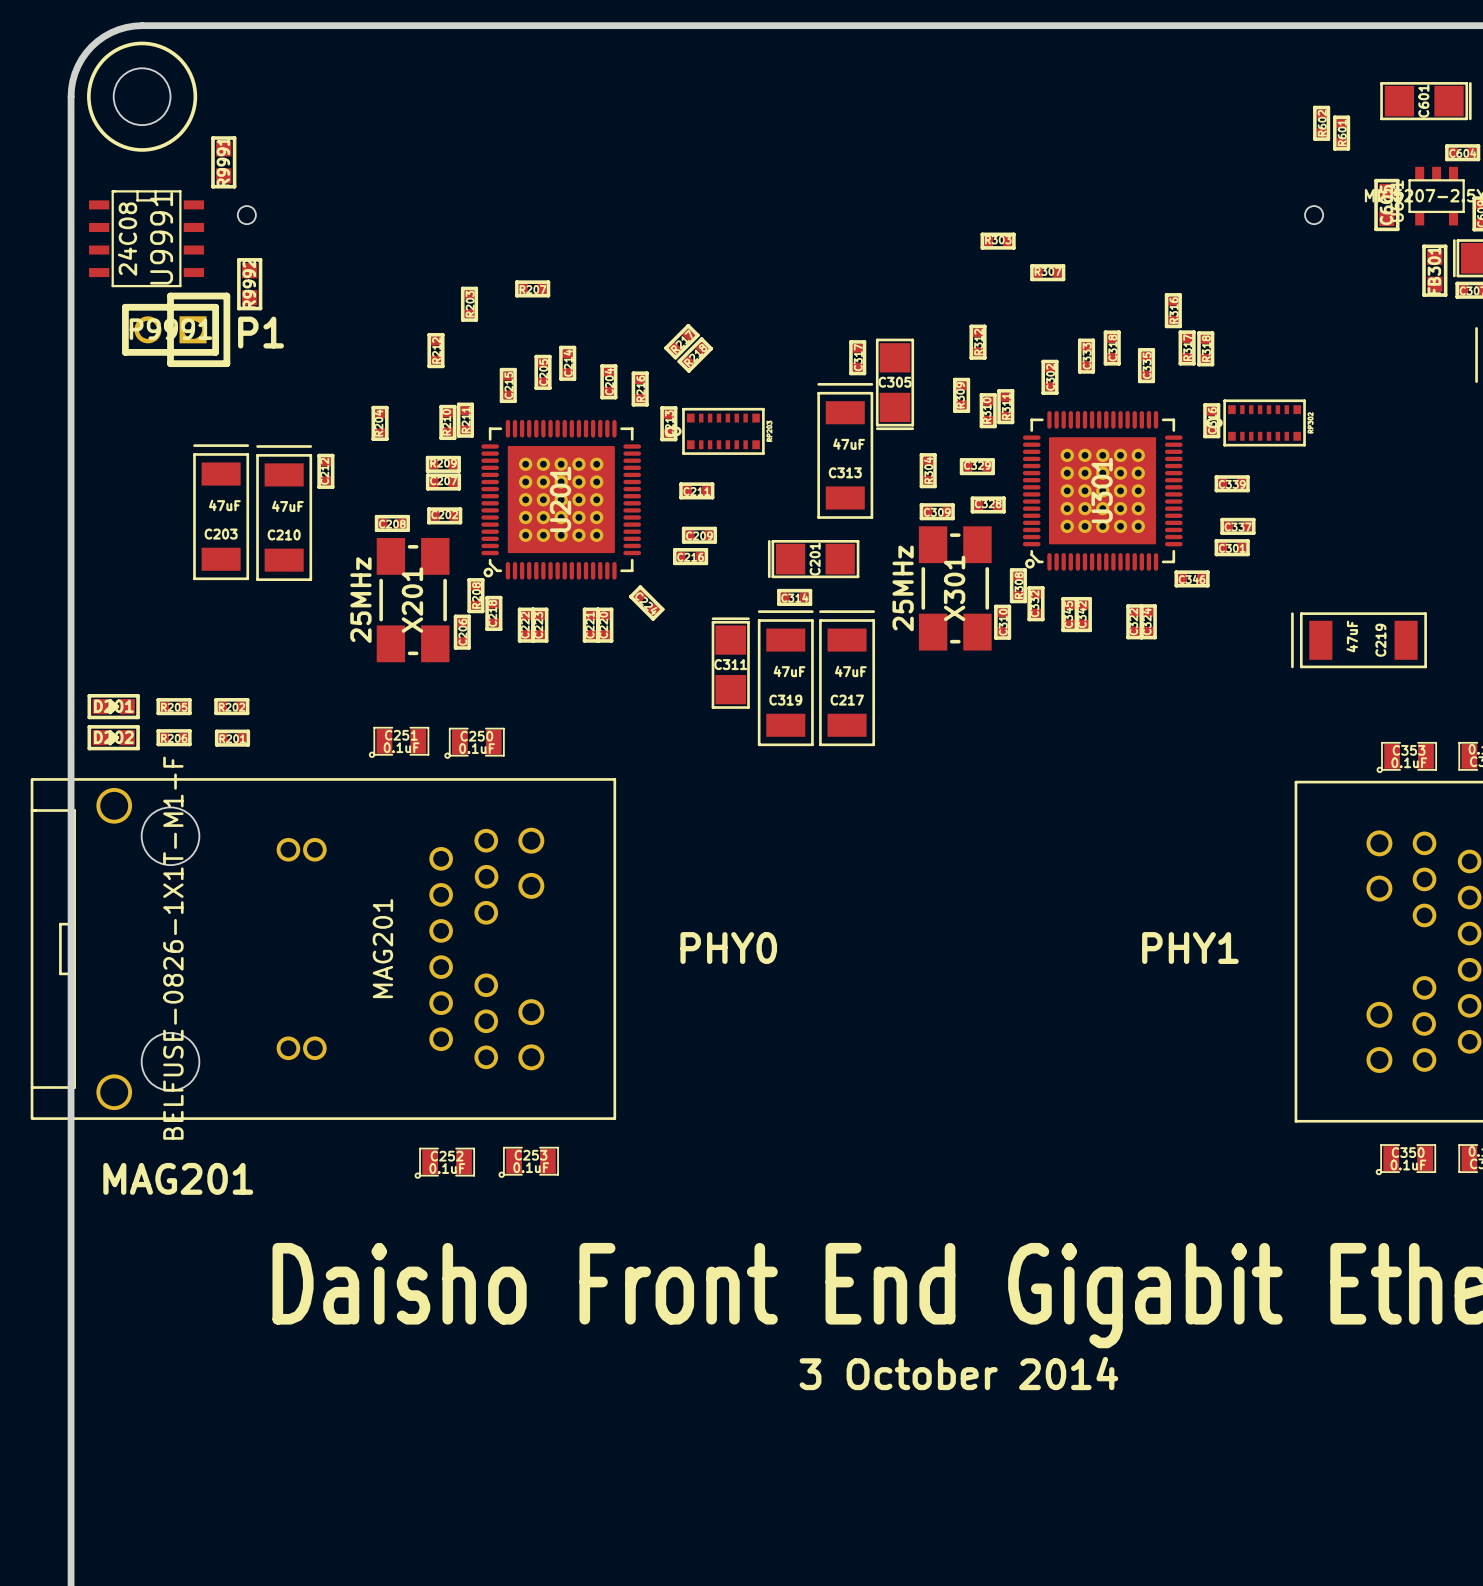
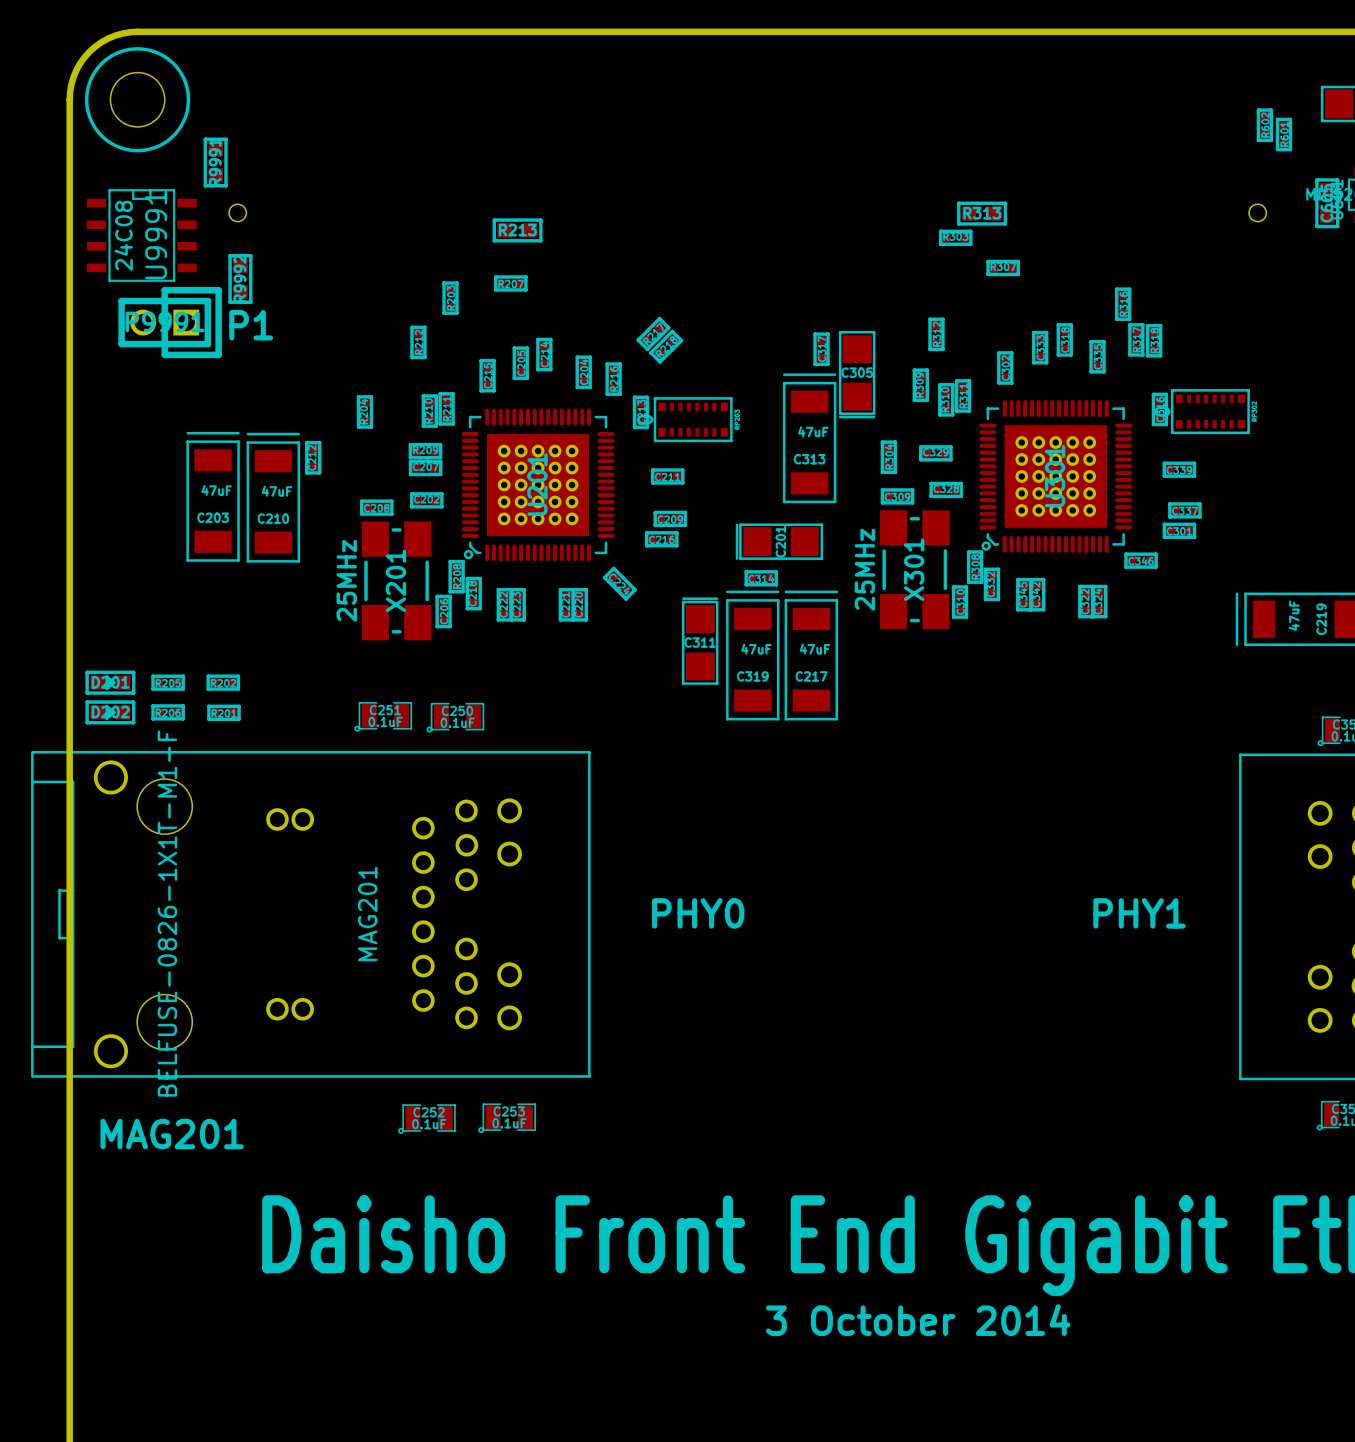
R313: none -> (982, 213)
R213: none -> (517, 230)

